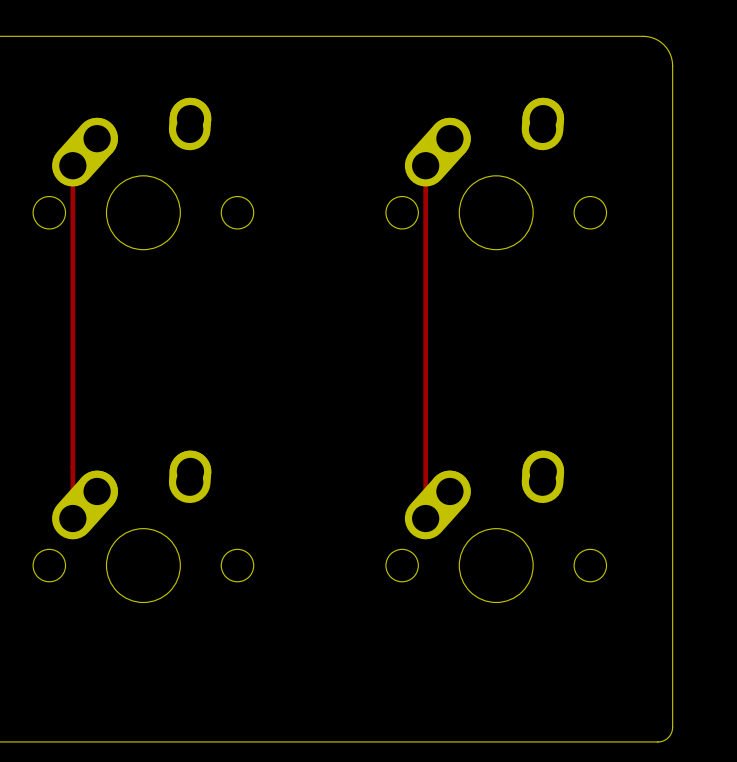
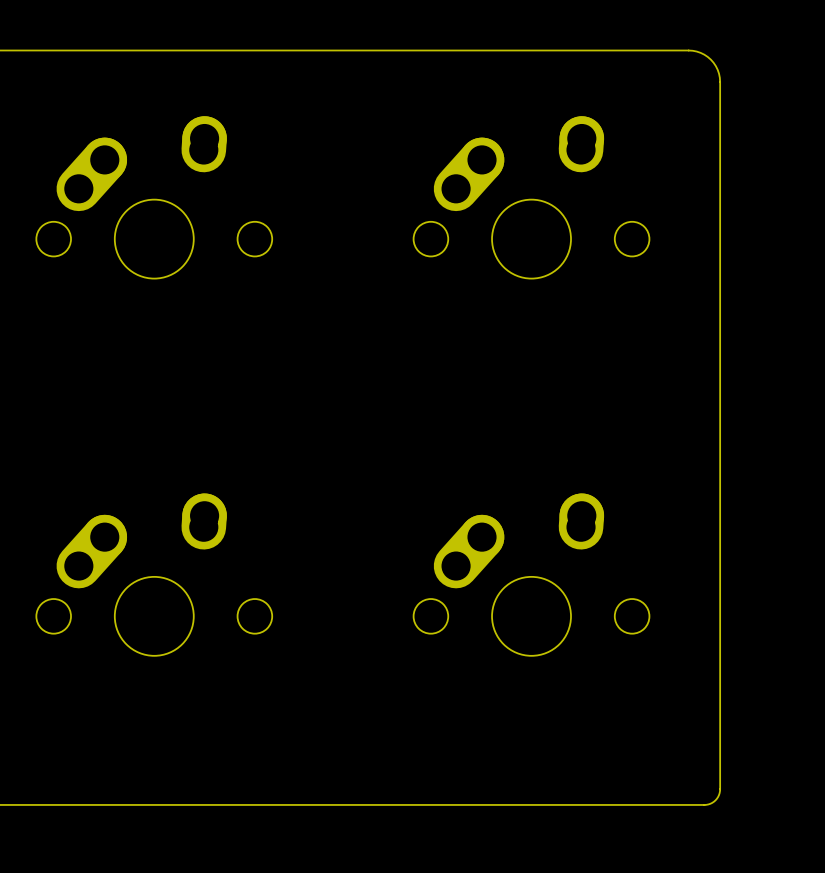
track: (72, 165) (72, 518) -> none
track: (425, 165) (425, 518) -> none

